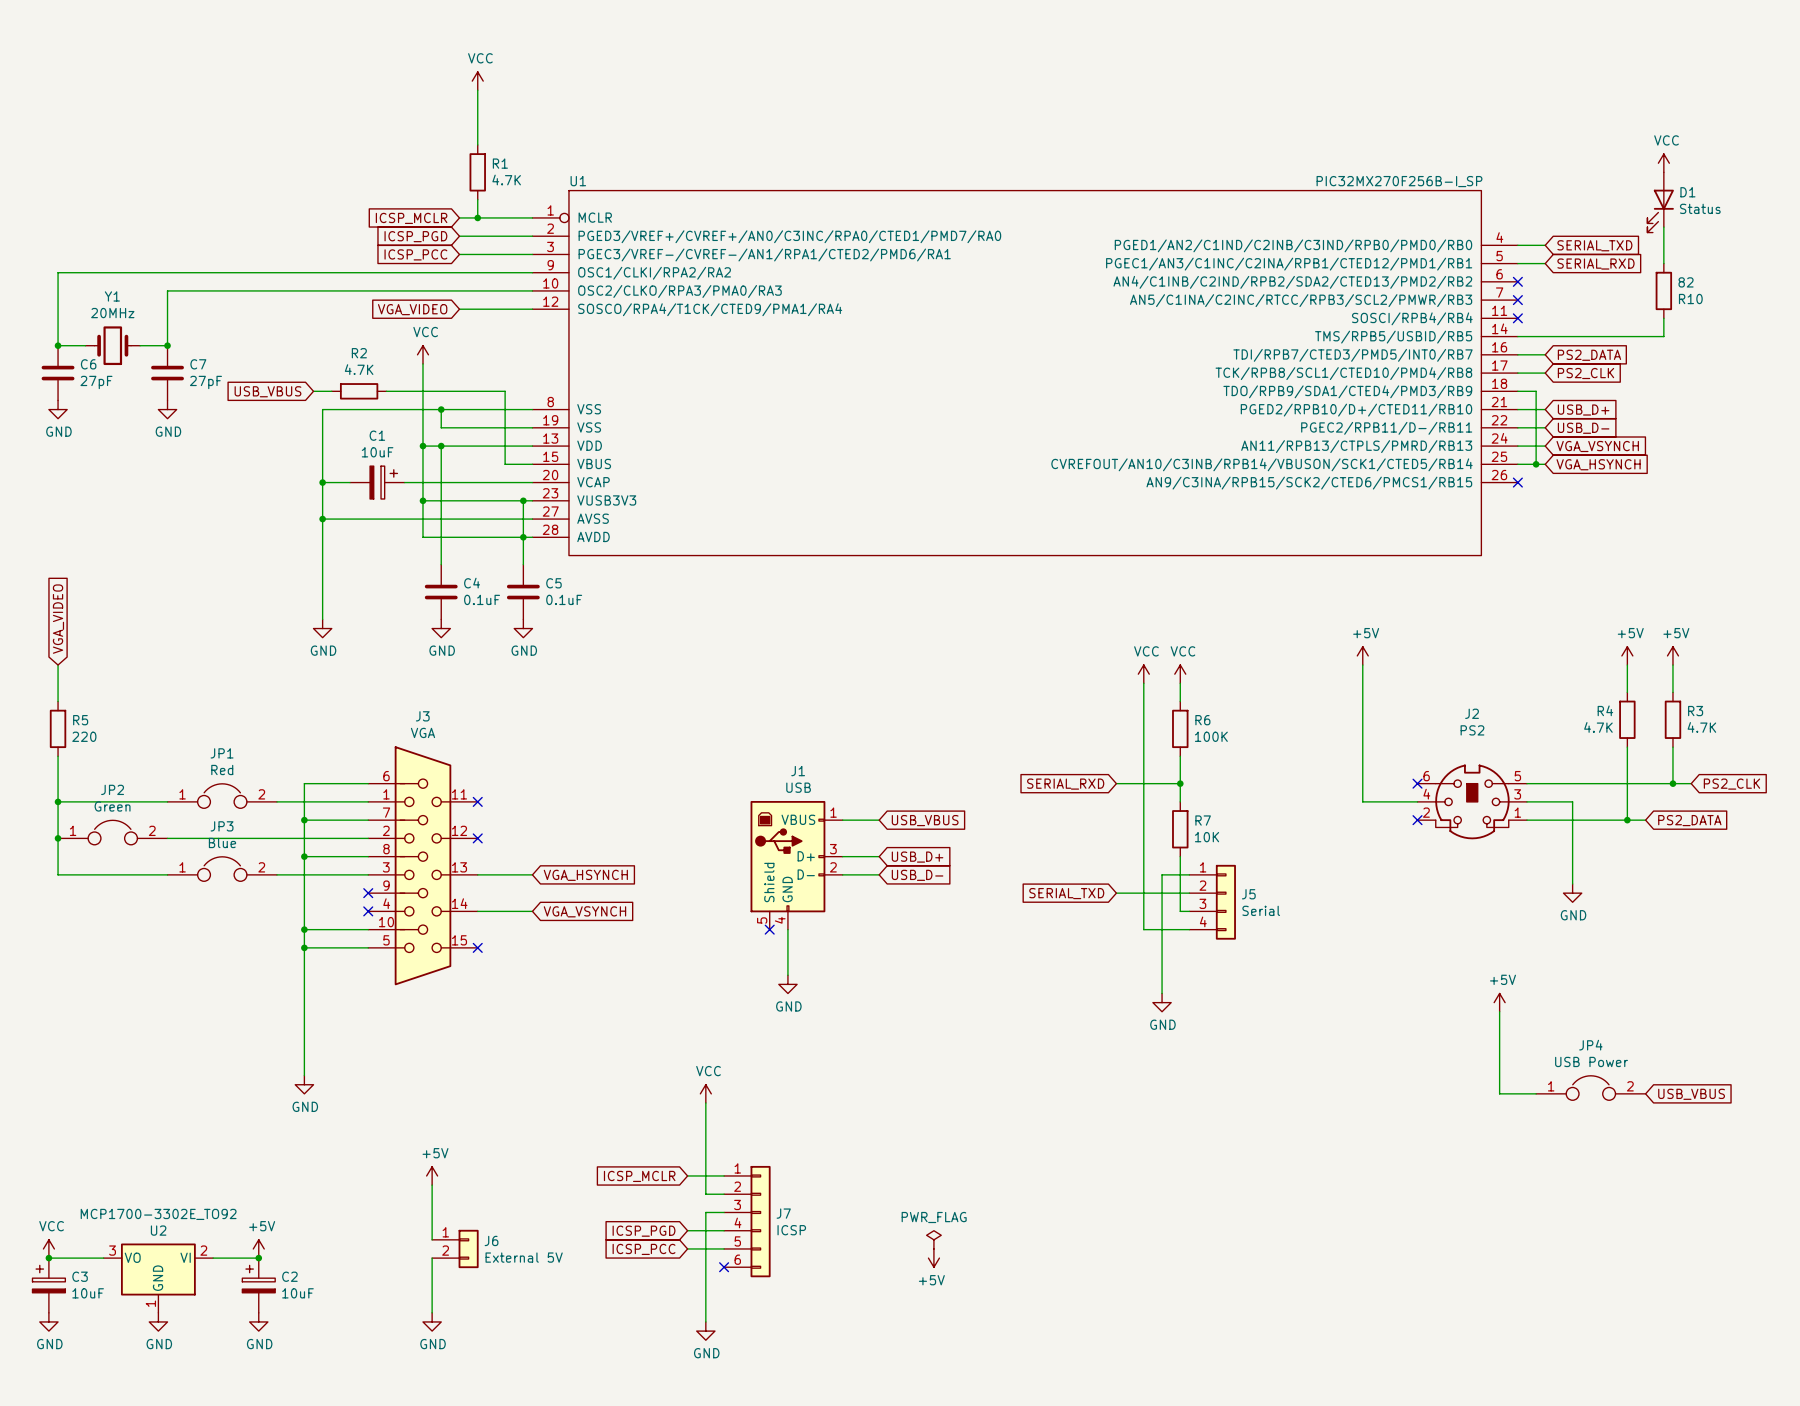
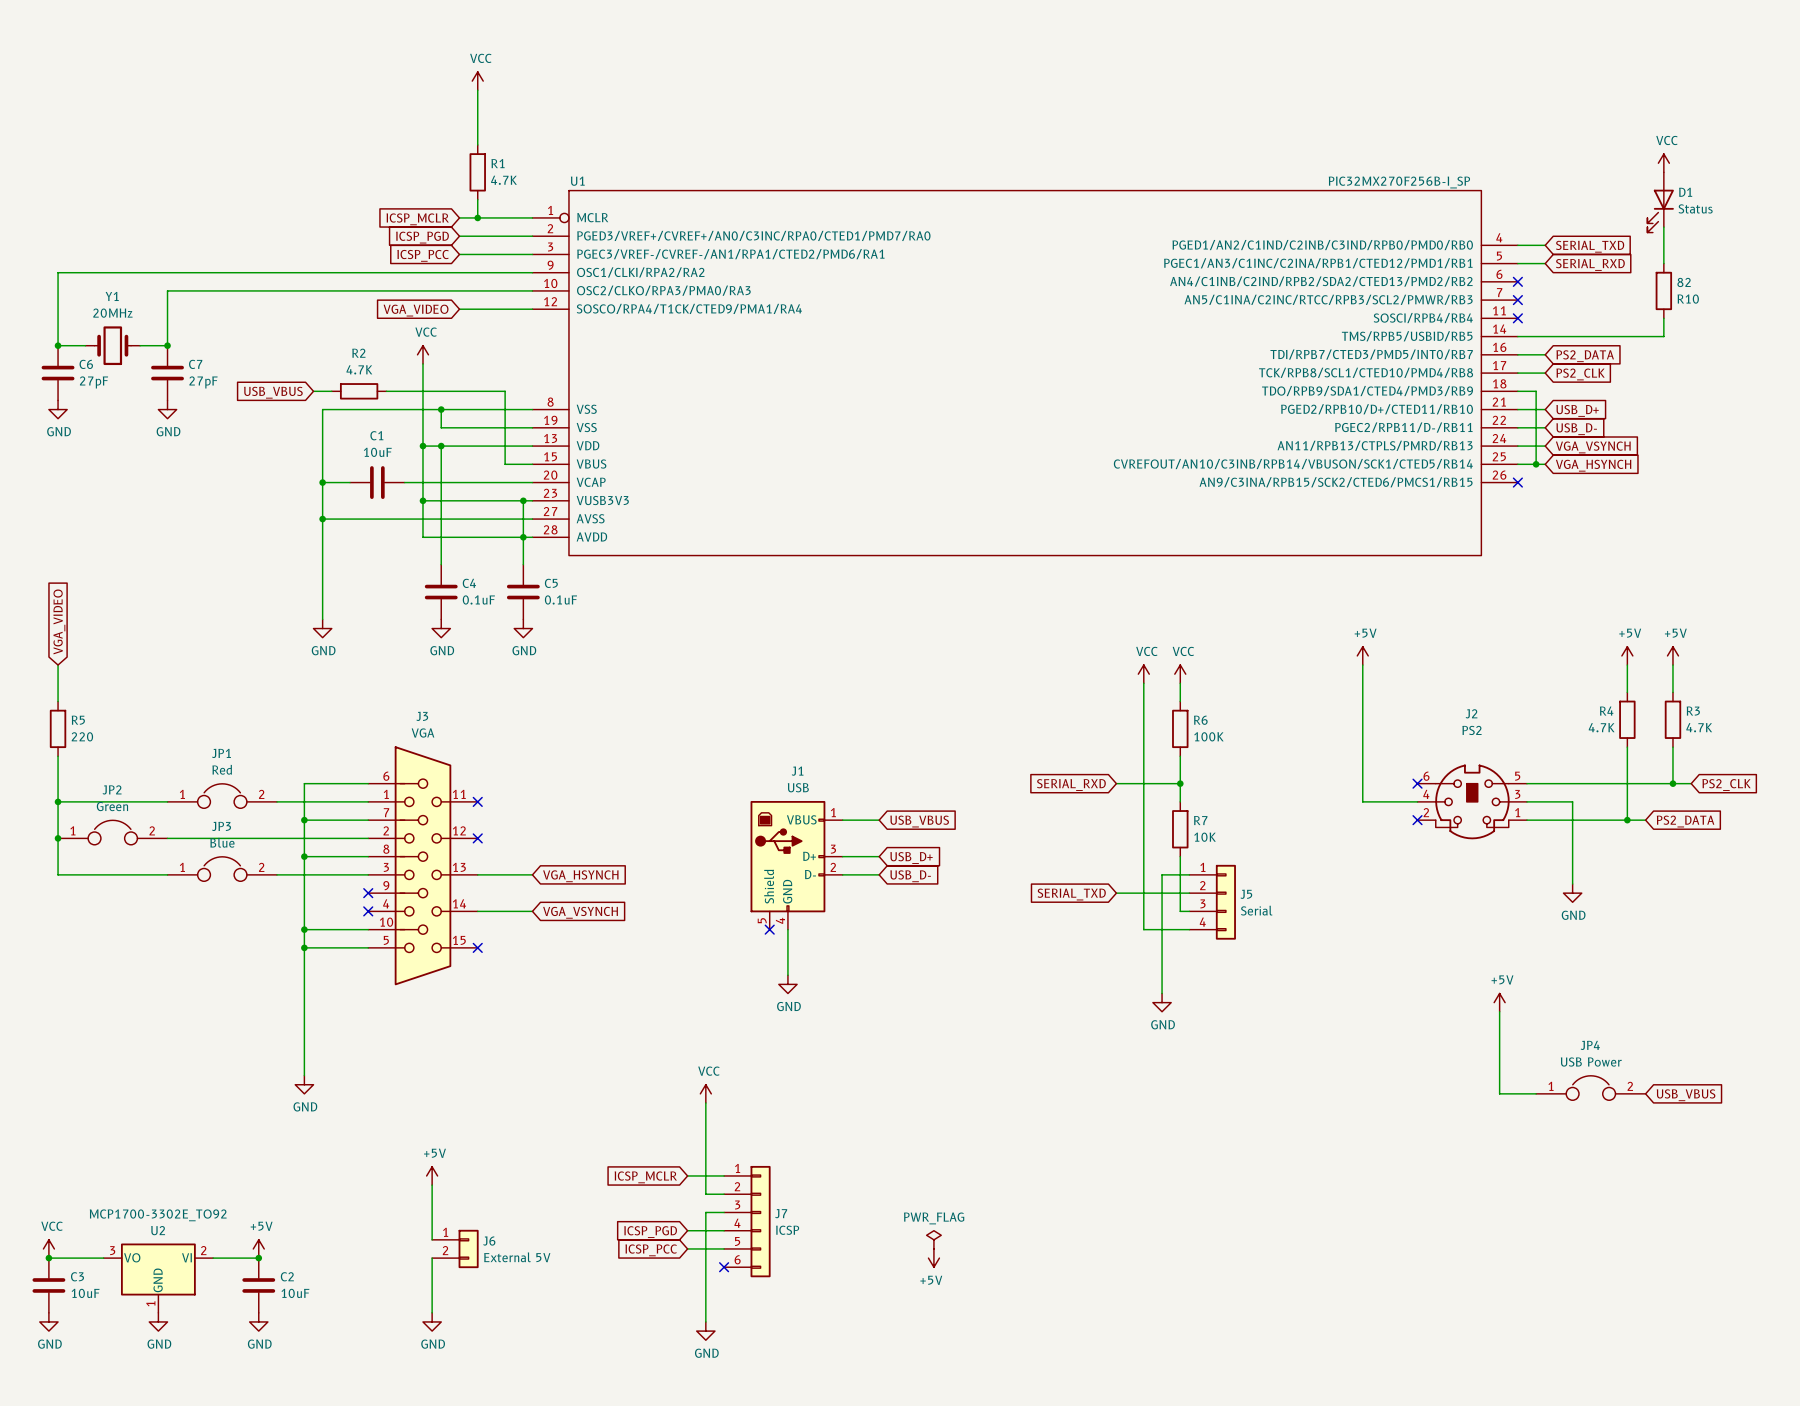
C1 symbol: [350, 466, 405, 499] -> [350, 466, 405, 499]
C3 symbol: [32, 1258, 66, 1313] -> [32, 1258, 66, 1313]
C2 symbol: [242, 1258, 276, 1313] -> [242, 1258, 276, 1313]

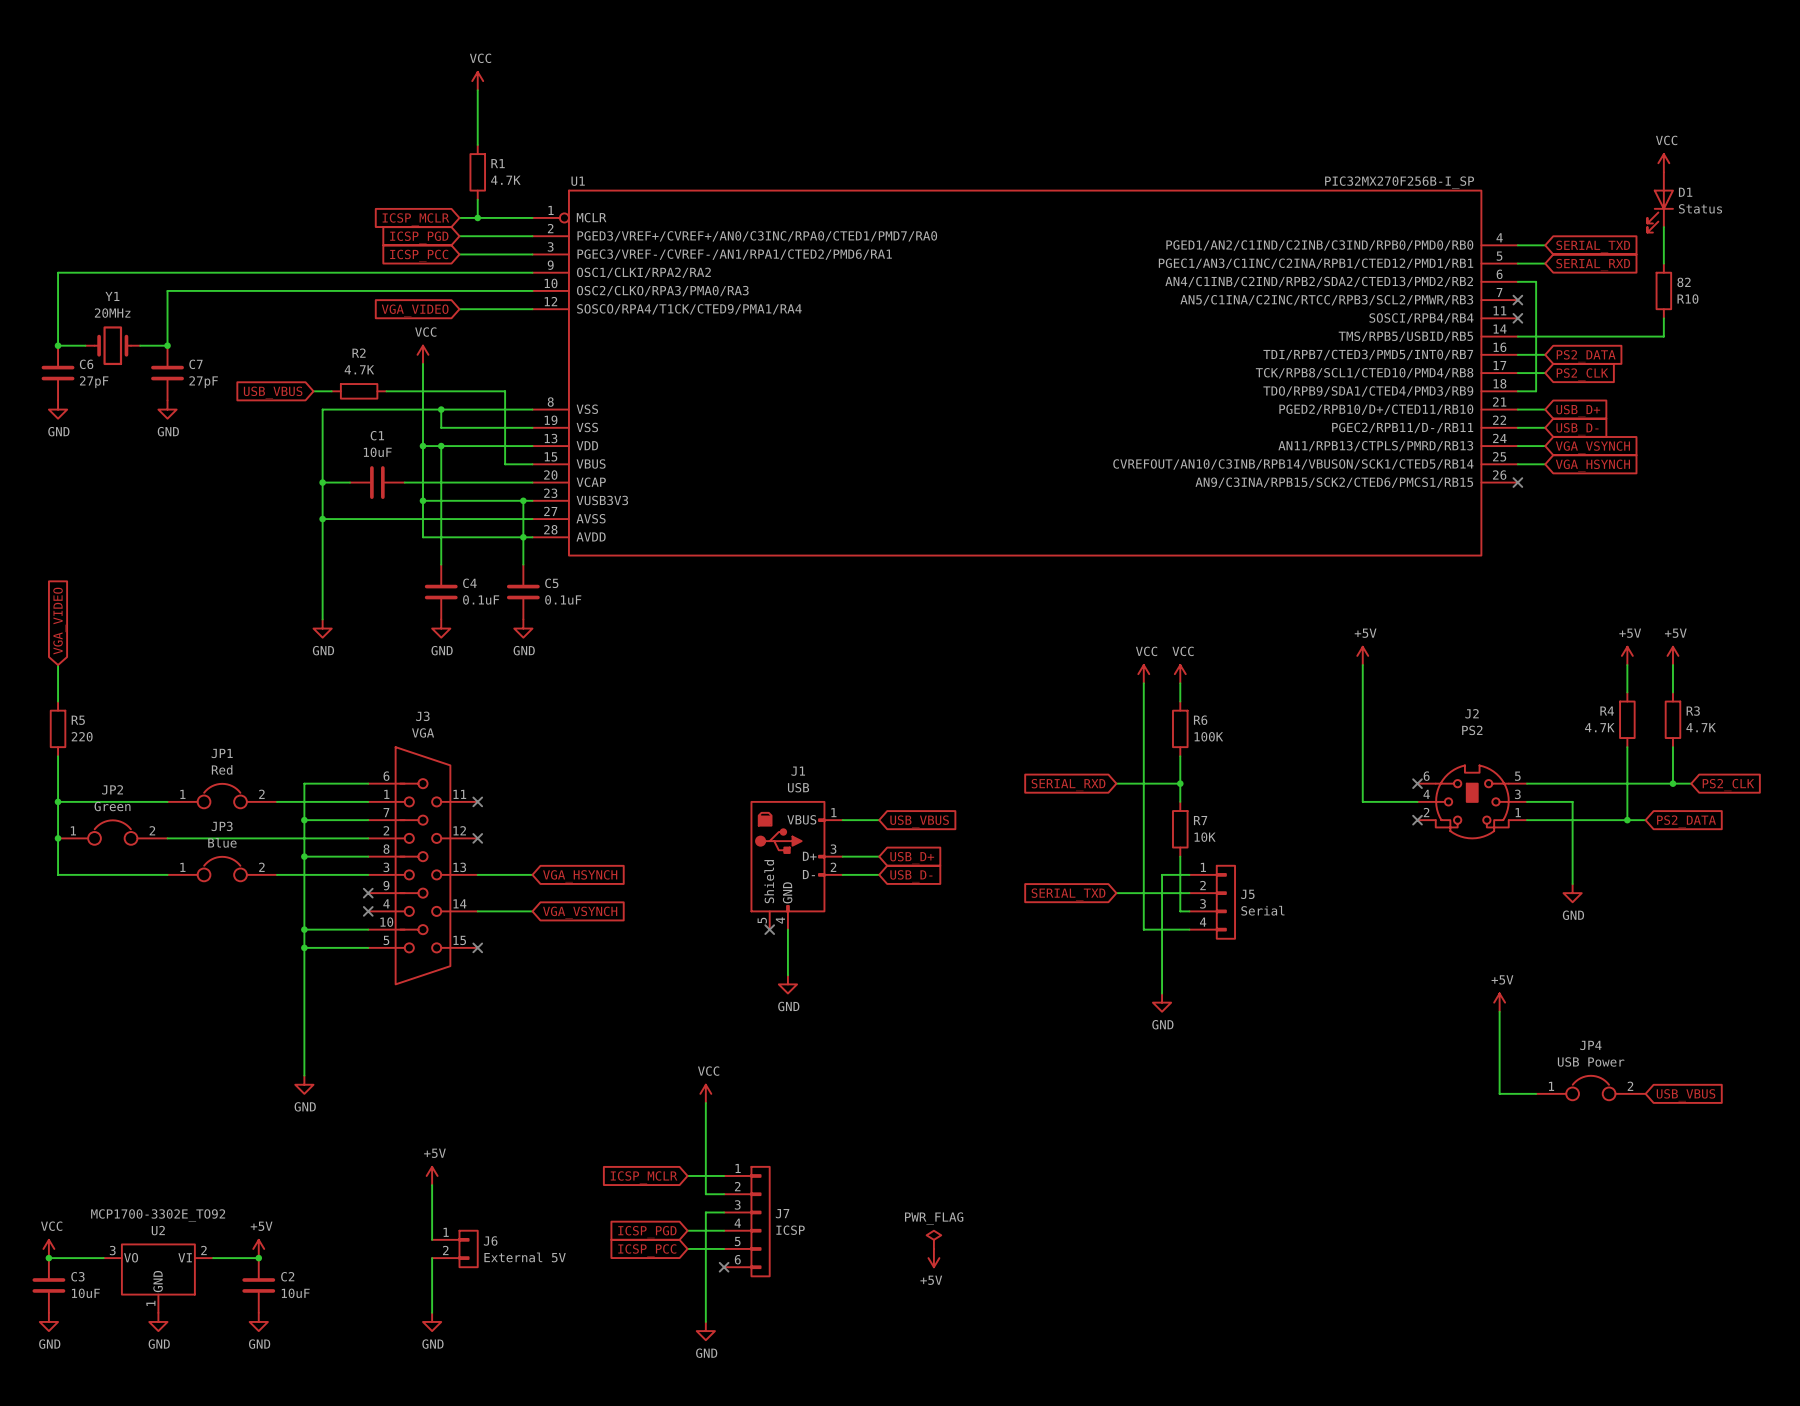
no-connect mark: (1517, 281) -> none
wire: (1536, 391) (1536, 464) -> (1536, 391) (1536, 281) (1517, 281)
junction: (1536, 464) -> none

